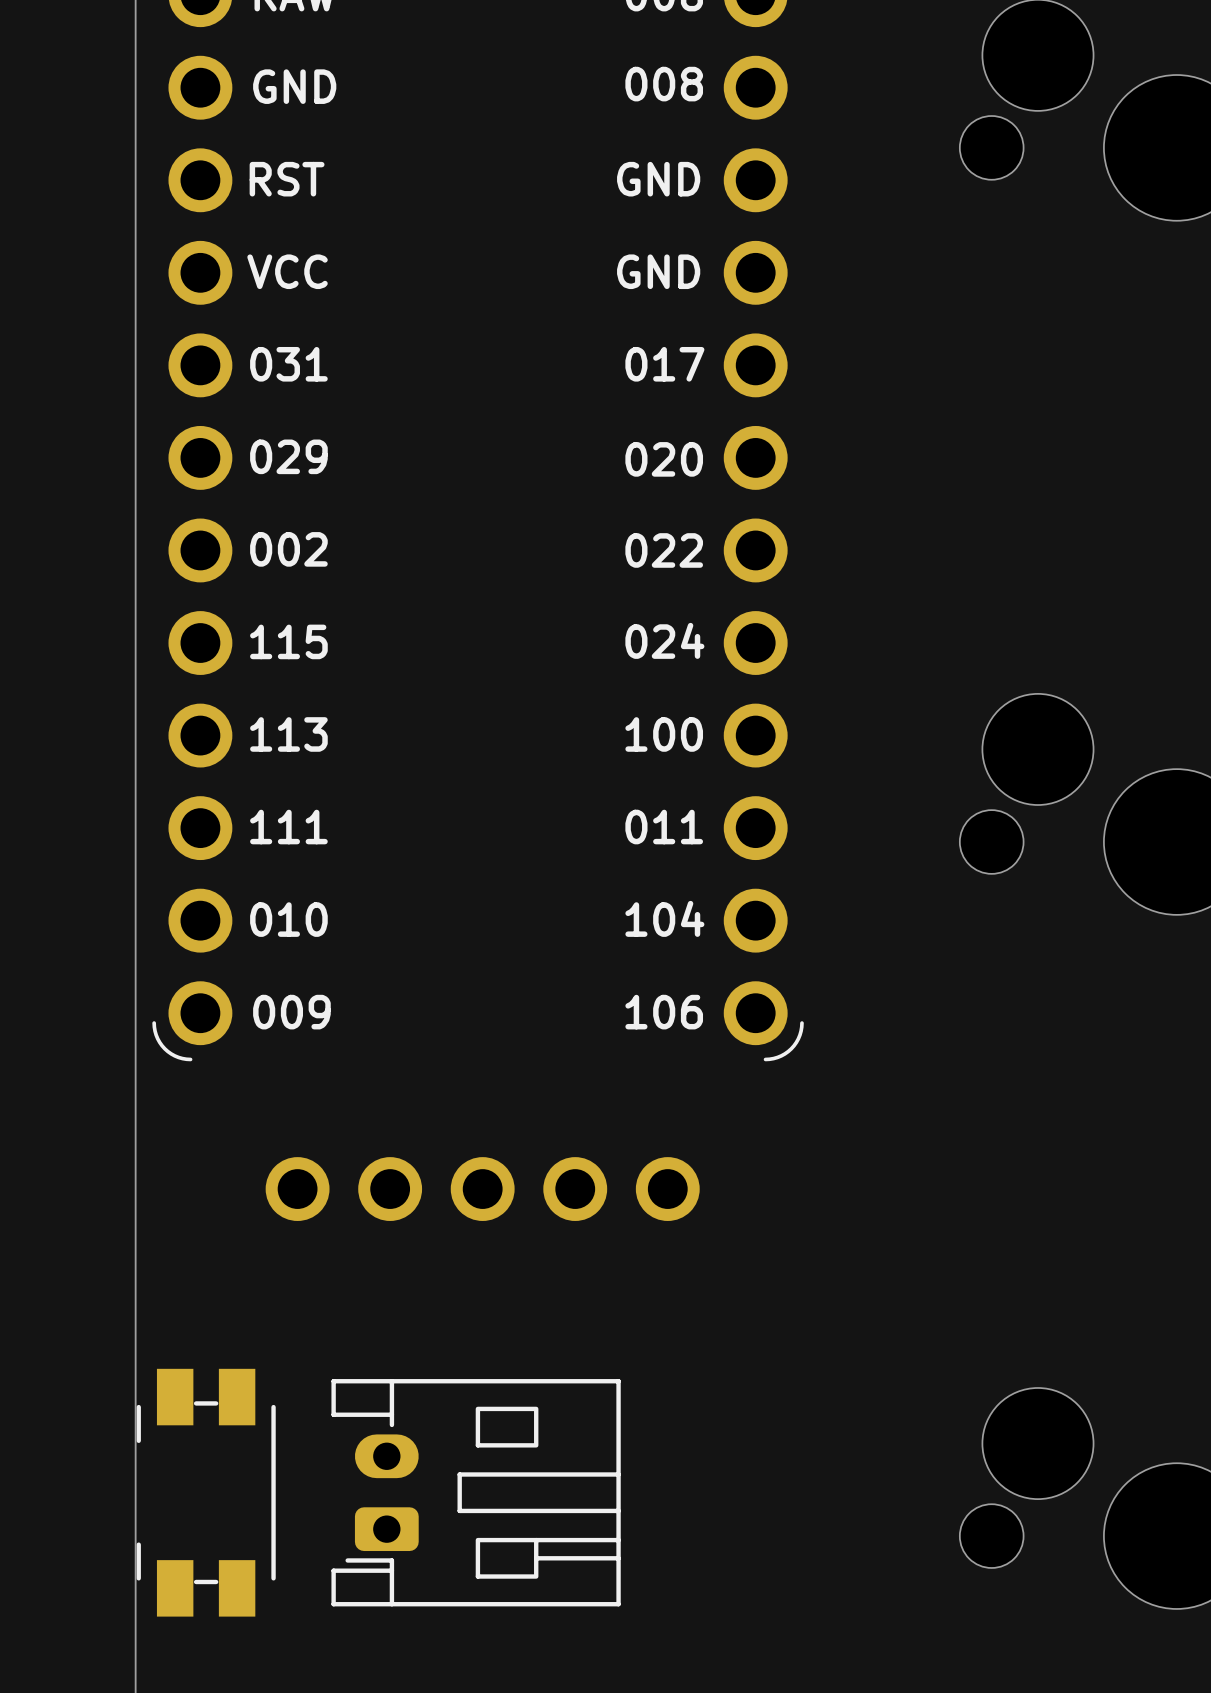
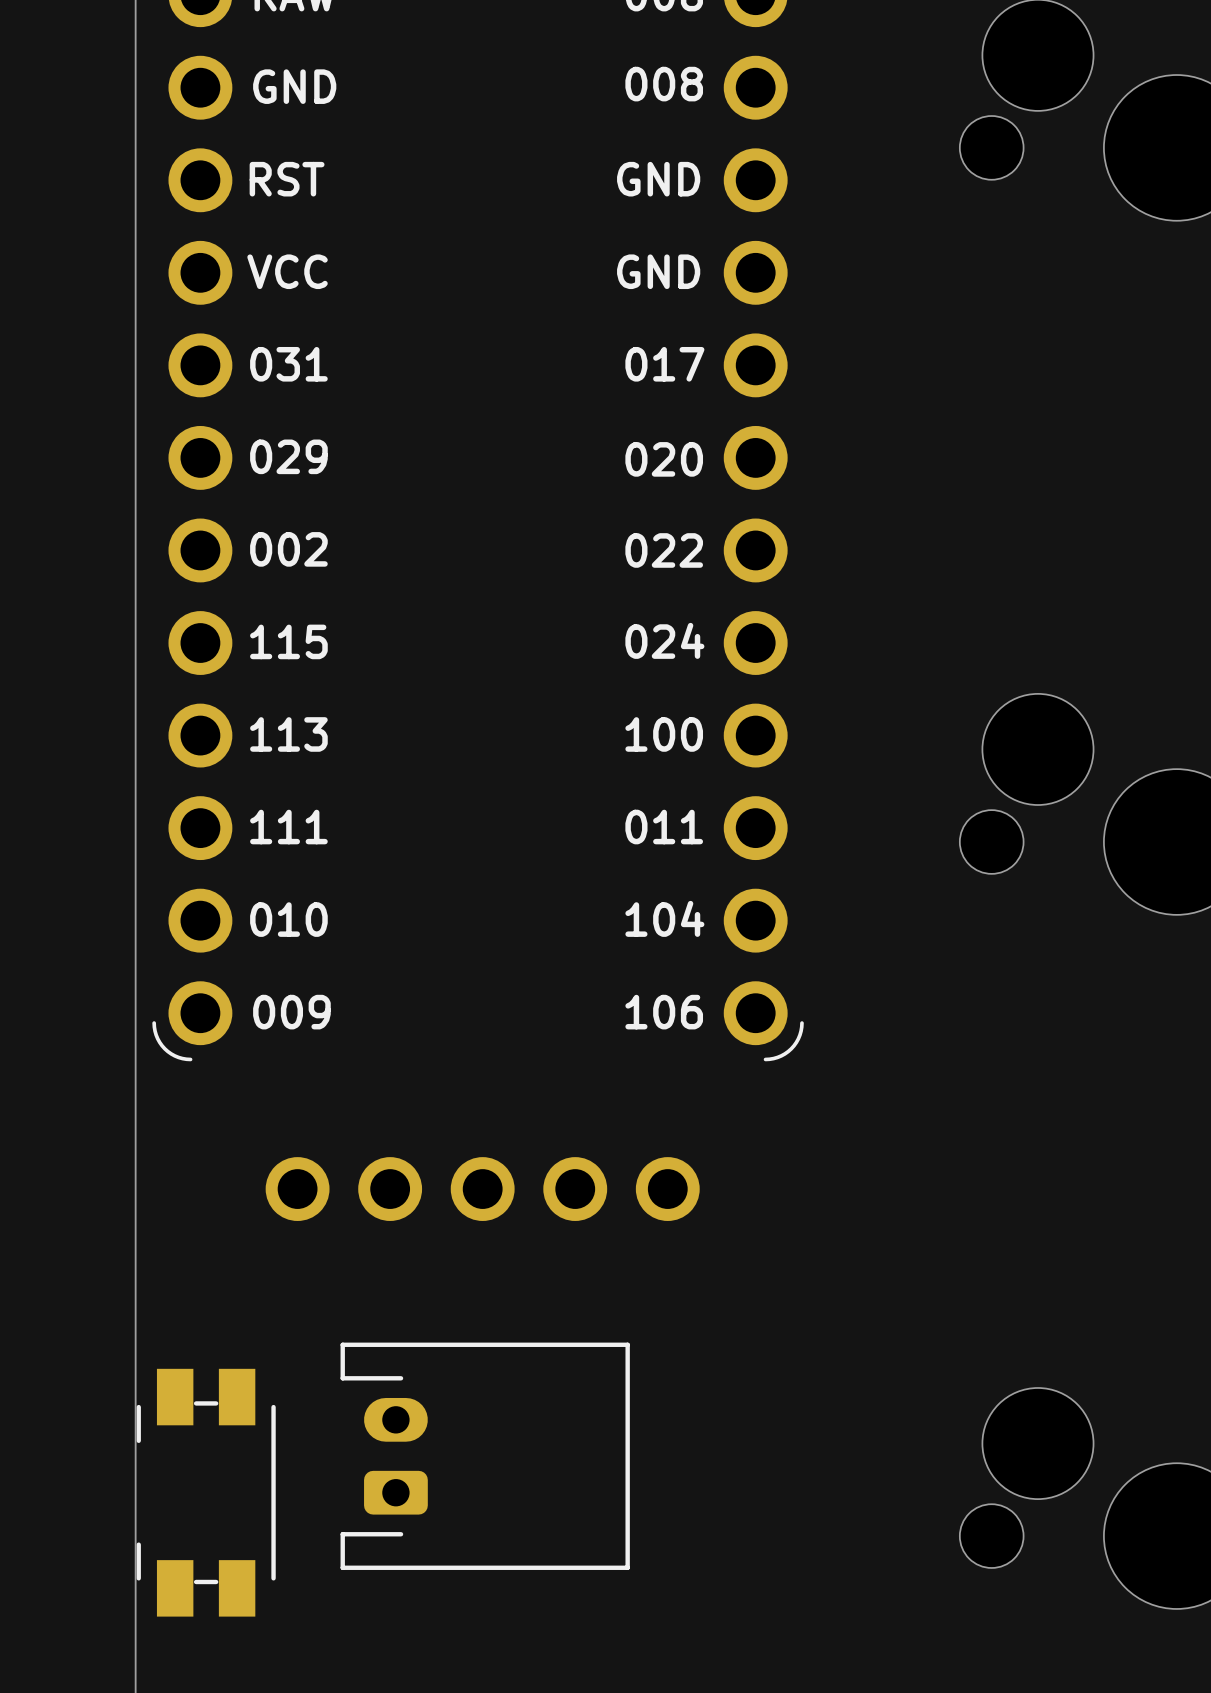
part: none -> (485, 1456)
part: (476, 1492) -> none

